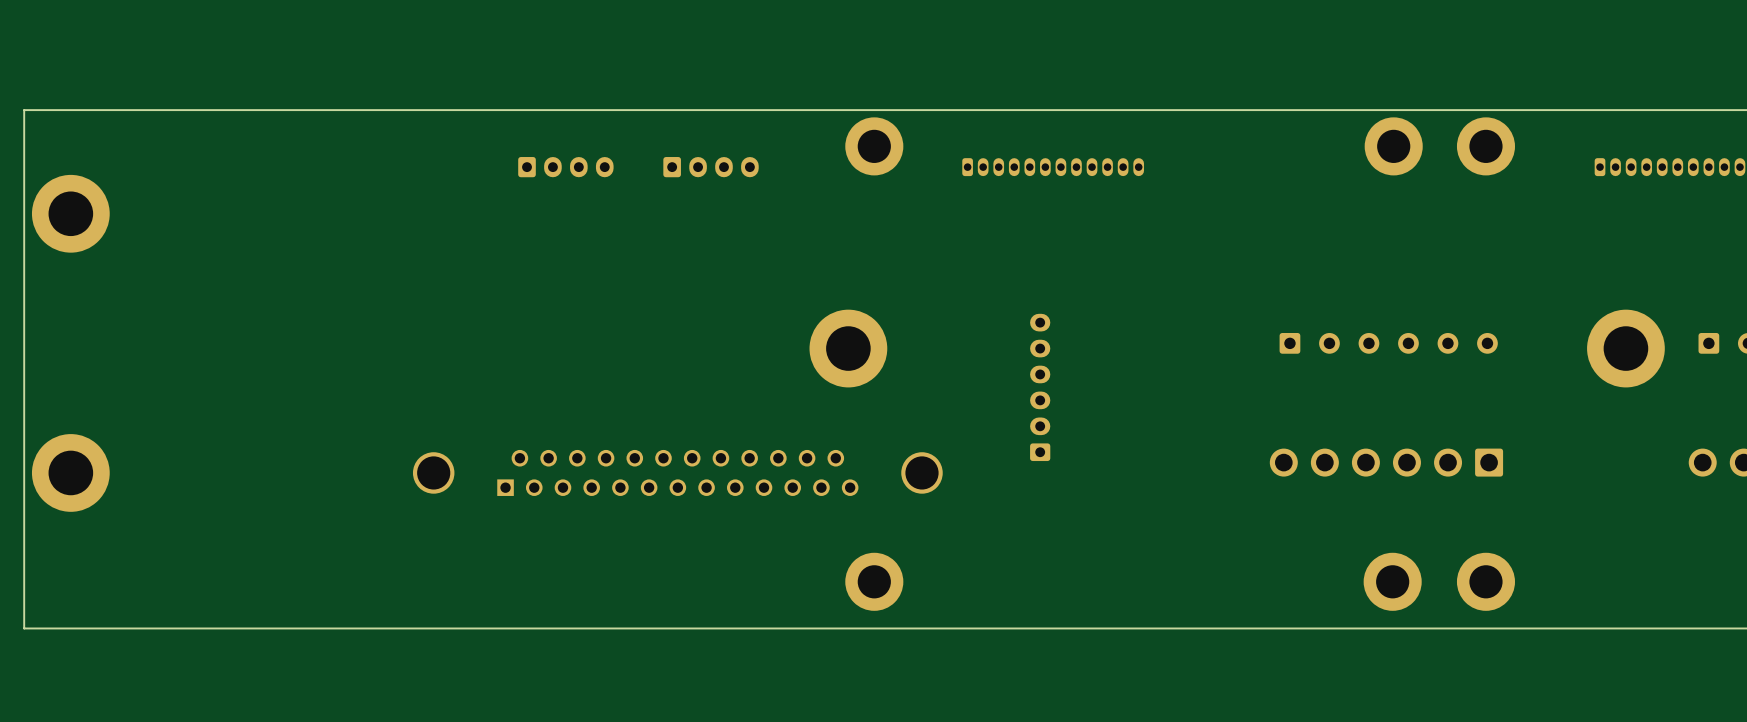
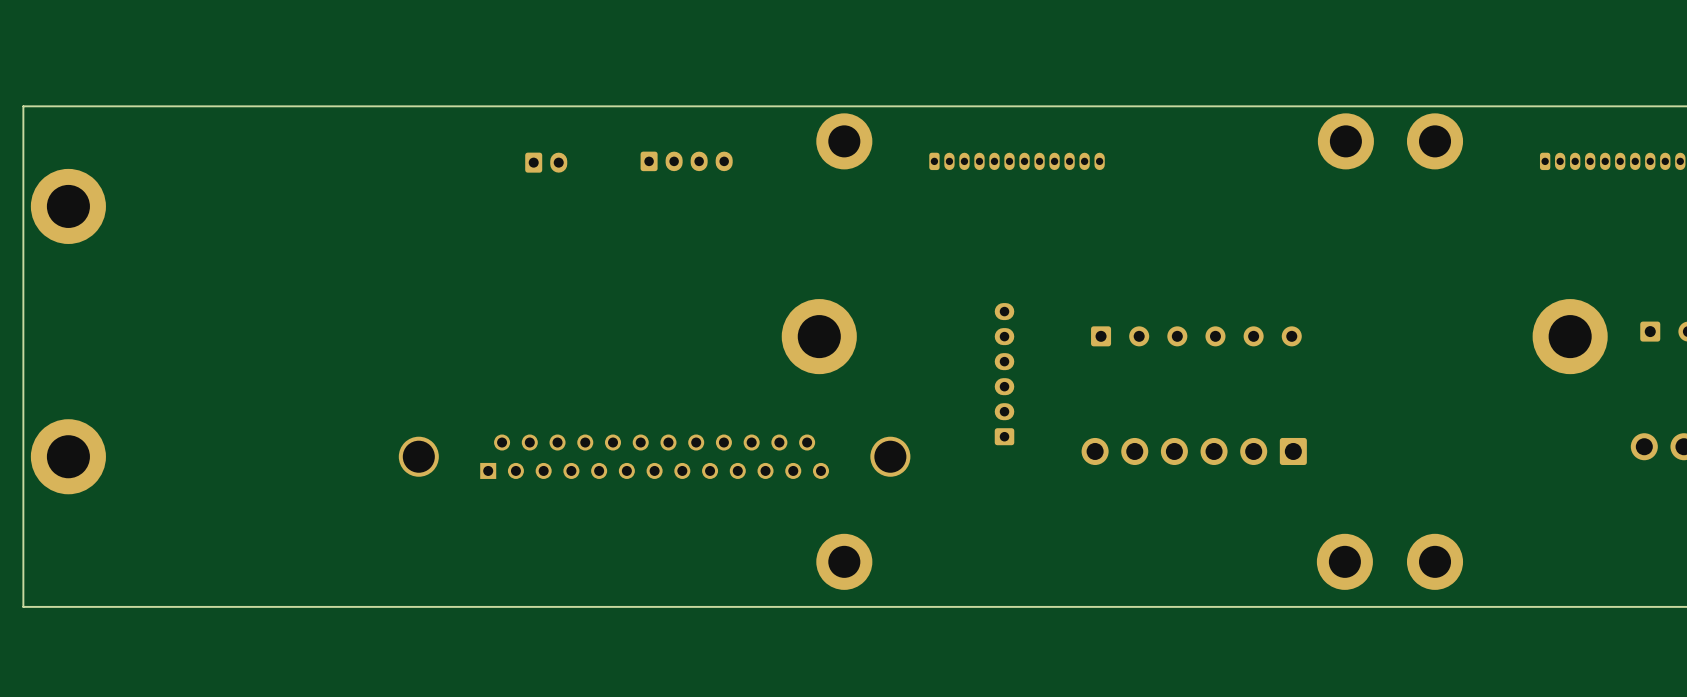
part footprint: [518, 157, 614, 178] -> [525, 152, 568, 173]
part position: (1388, 343) -> (1196, 336)
part position: (1386, 462) -> (1194, 451)

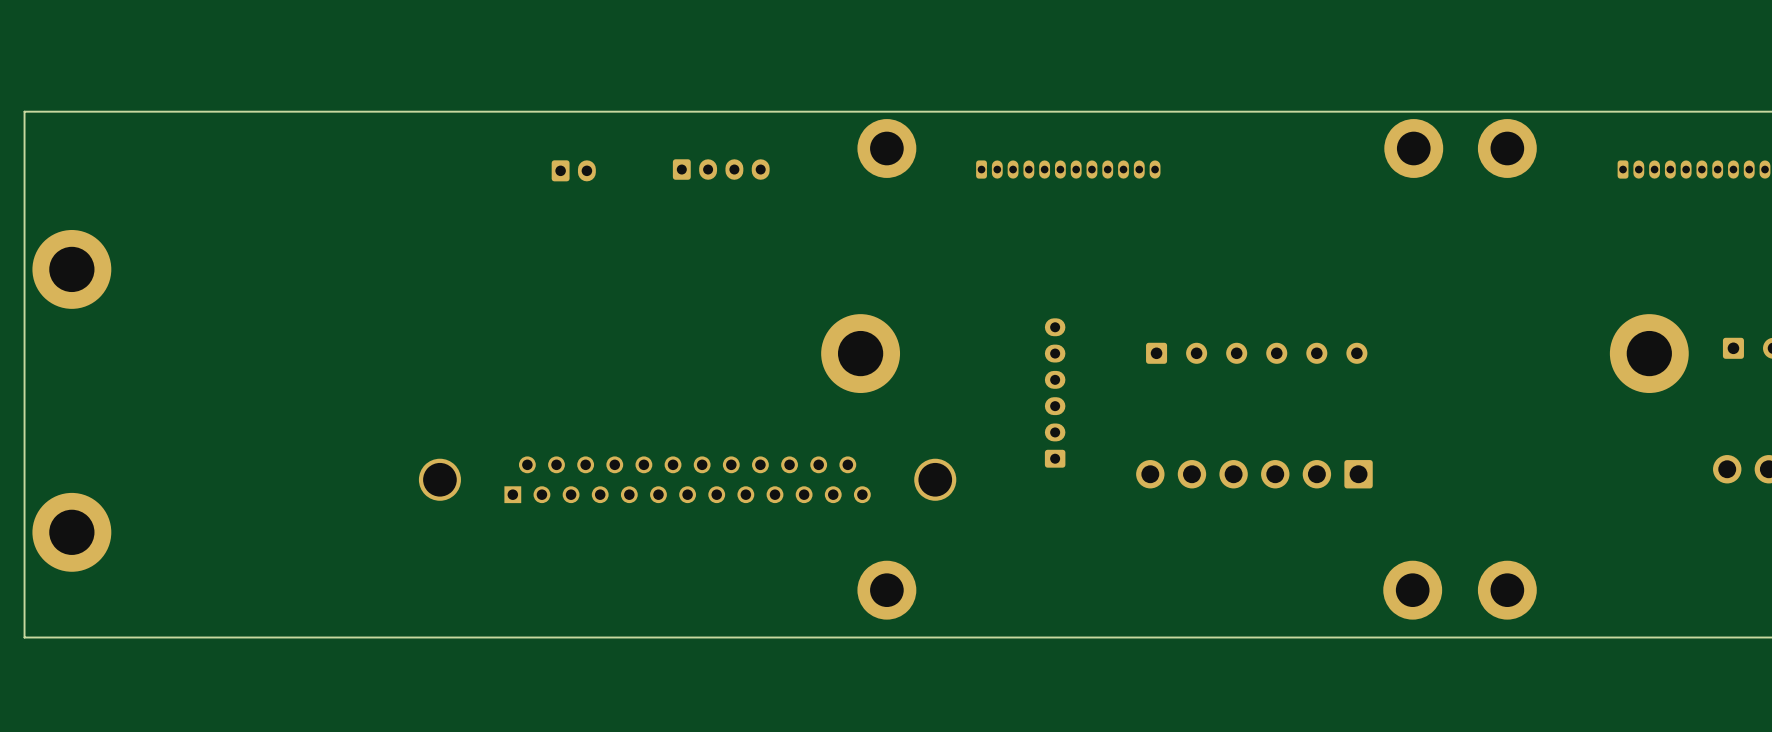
part position: (68, 206) -> (71, 269)
part position: (68, 456) -> (71, 532)

